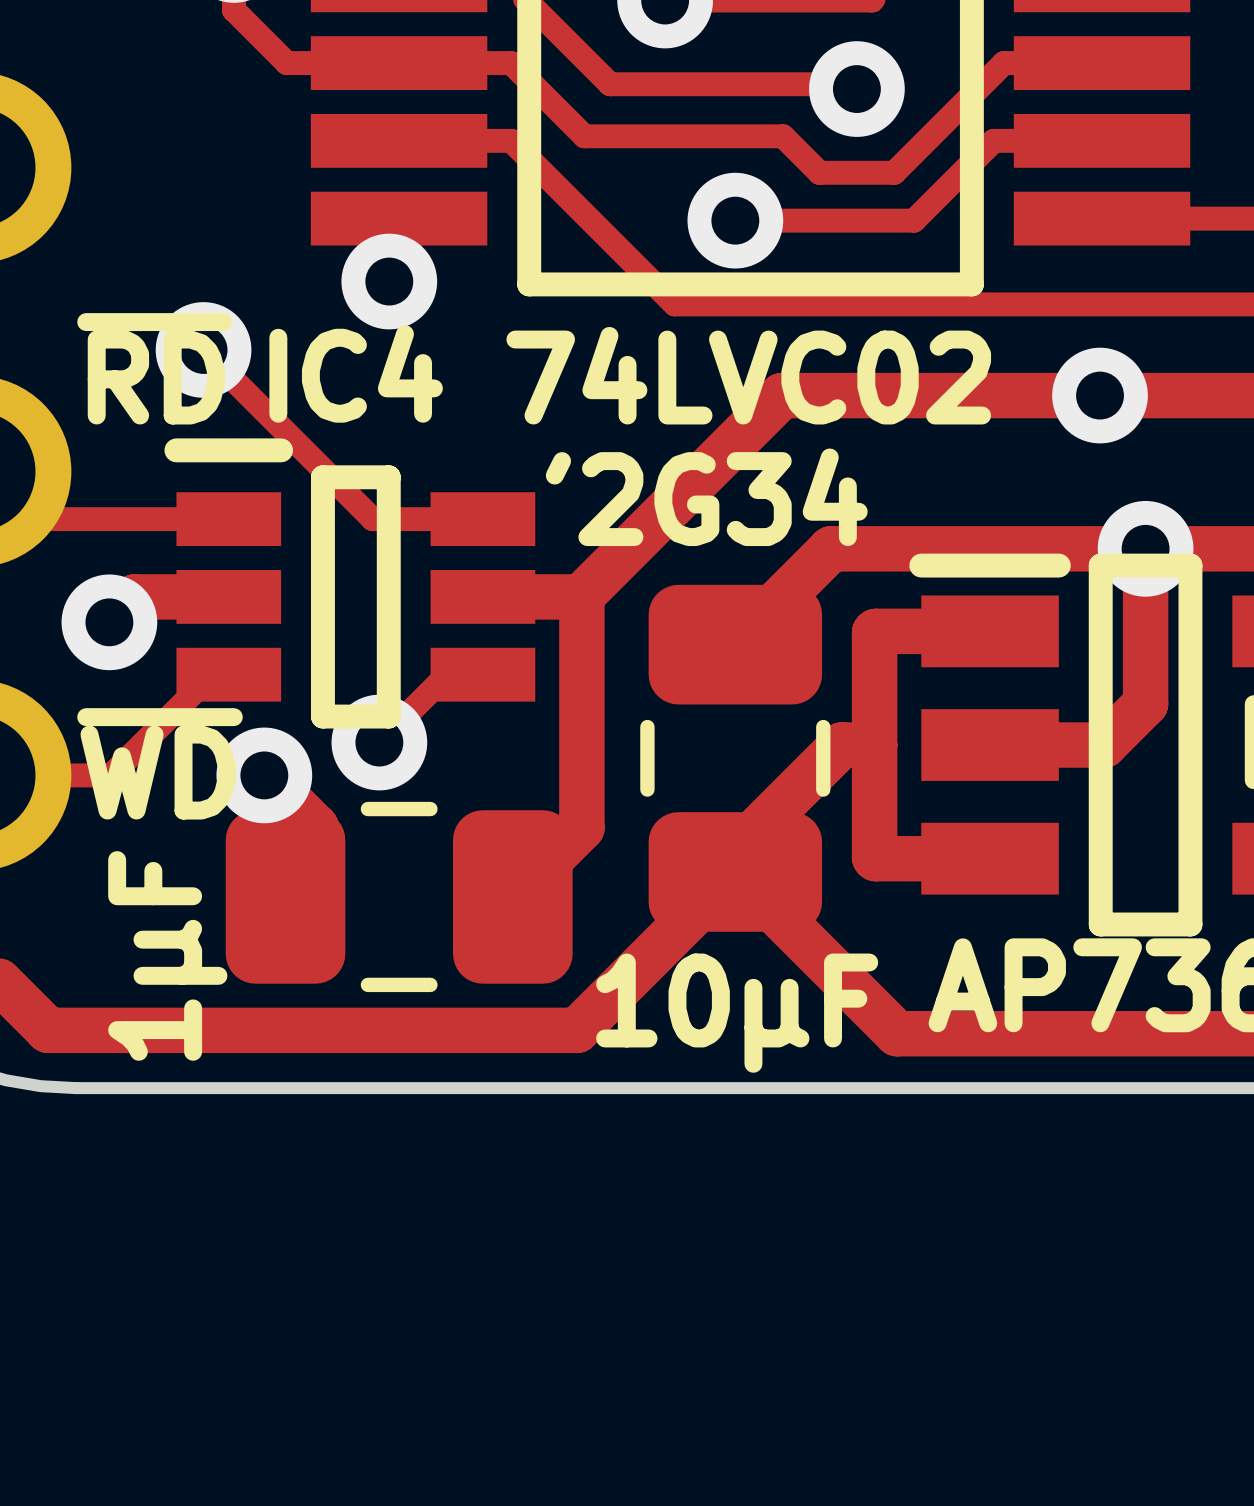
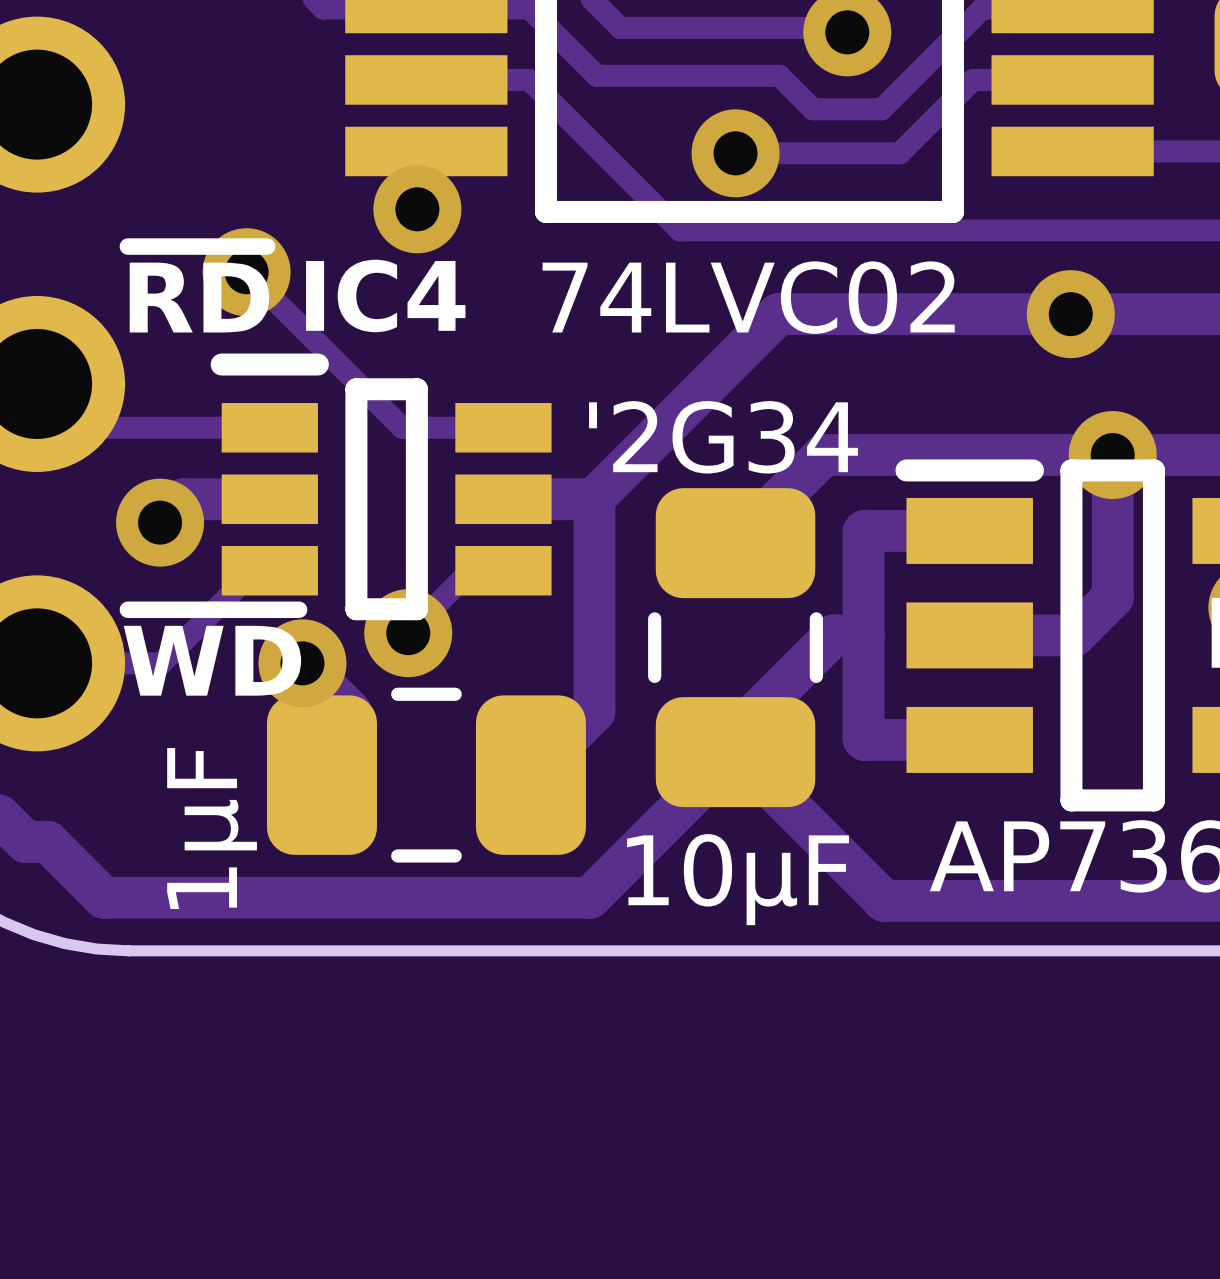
IC4 text position: '2G34 (706, 497) -> '2G34 (723, 437)

